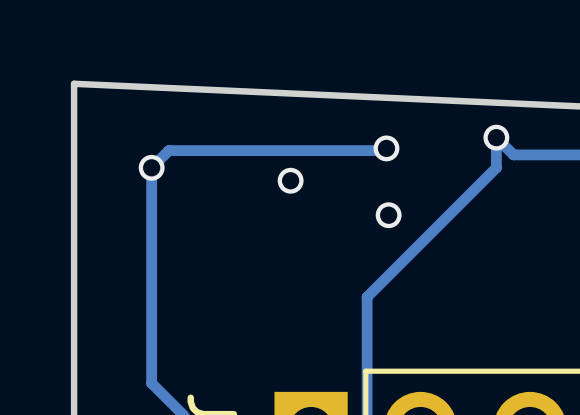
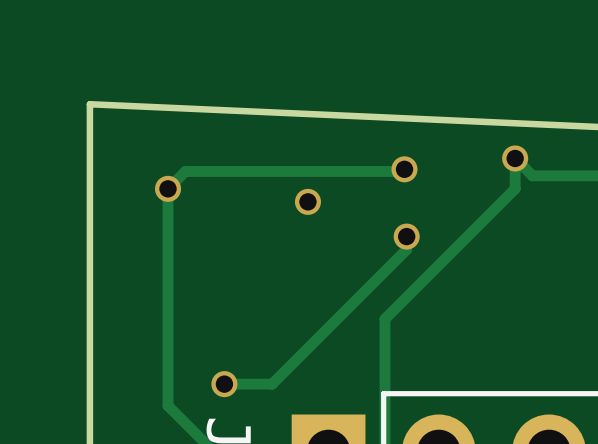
track: none -> (406, 236) (406, 249) (272, 384) (224, 384)
via: none -> (224, 384)

